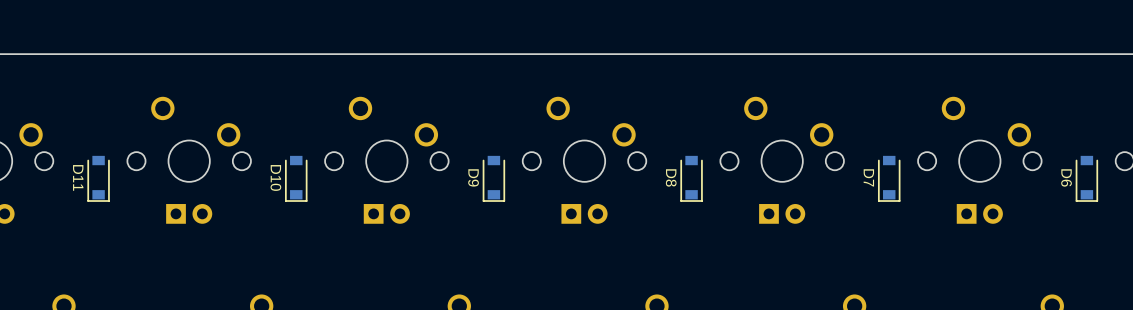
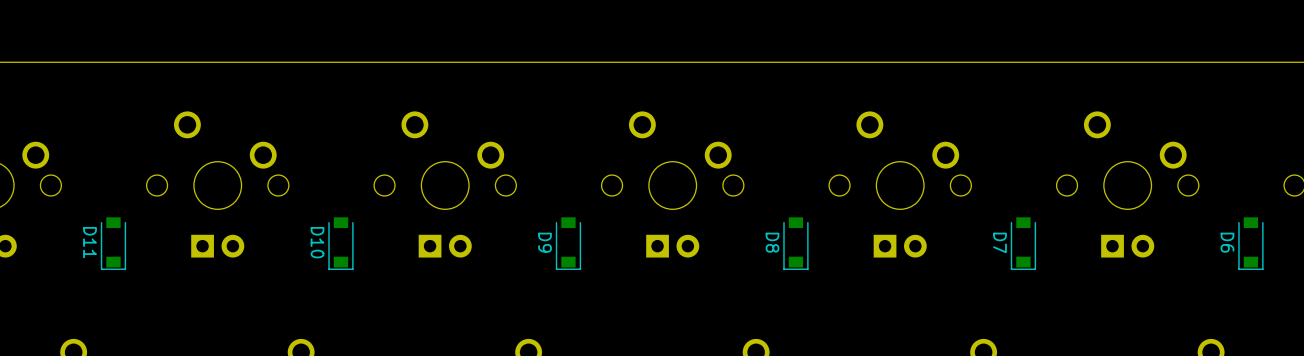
D11 position: (98, 178) -> (113, 243)
D10 position: (296, 178) -> (340, 243)
D9 position: (493, 178) -> (568, 243)
D8 position: (691, 178) -> (795, 243)
D7 position: (889, 178) -> (1023, 243)
D6 position: (1086, 178) -> (1250, 243)

